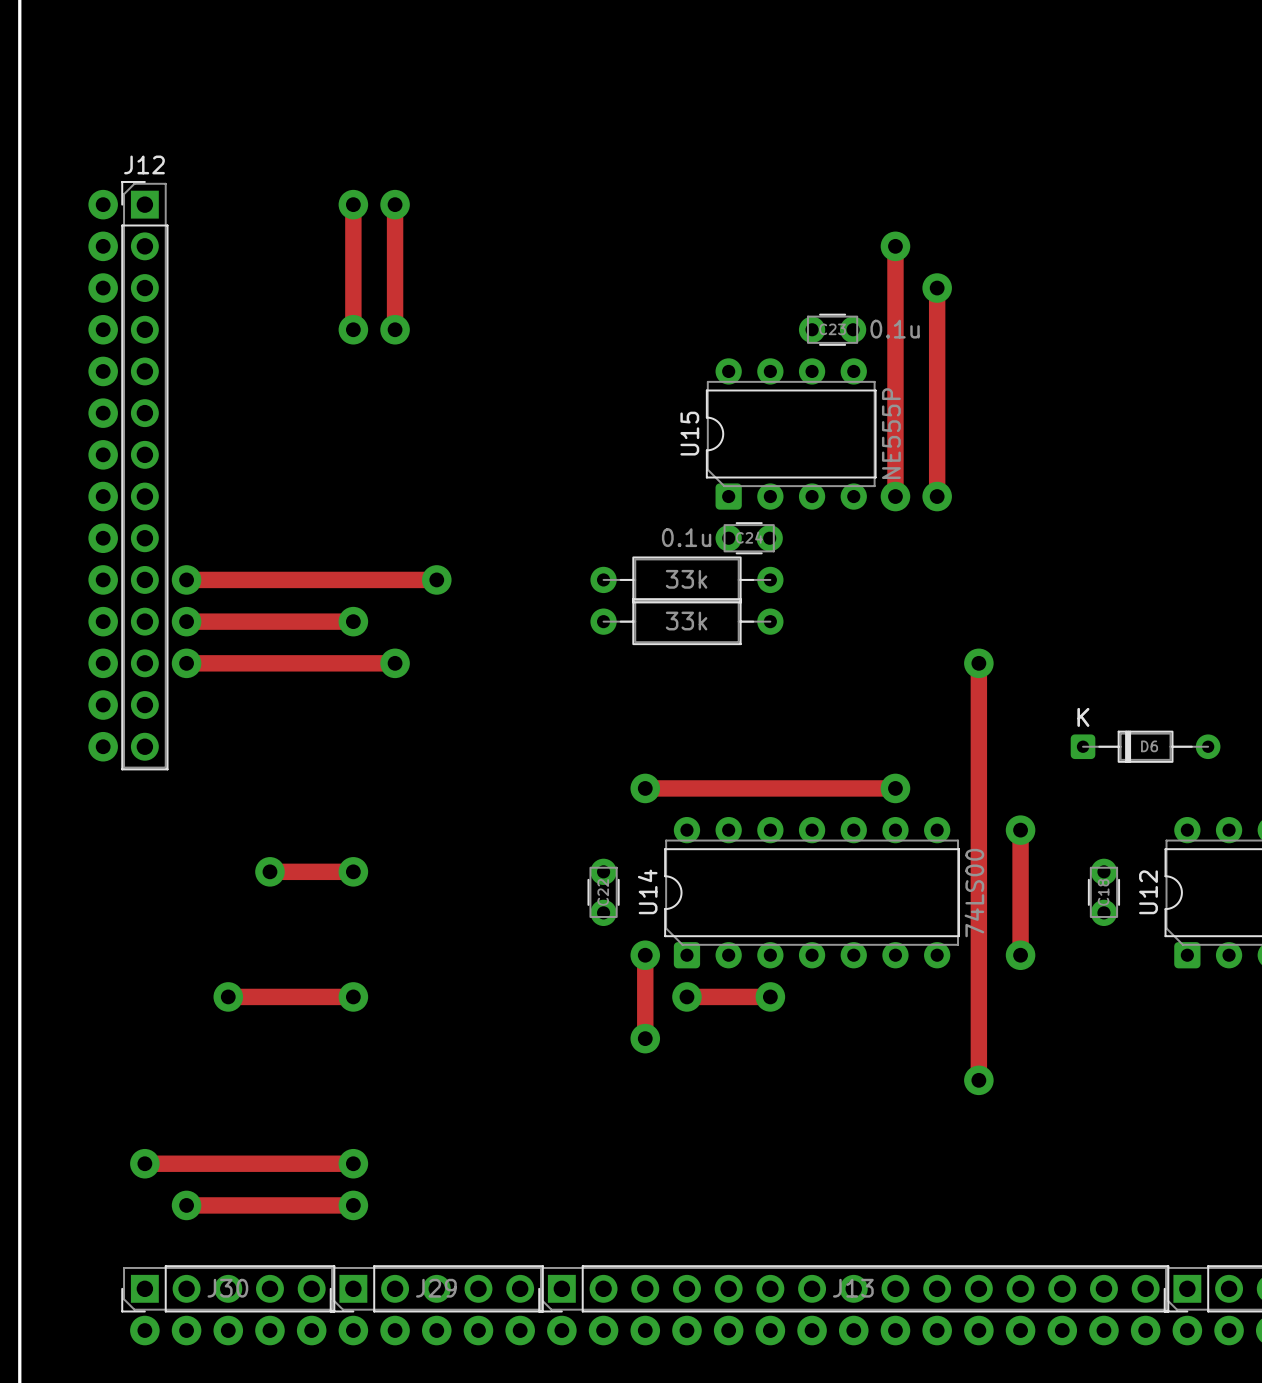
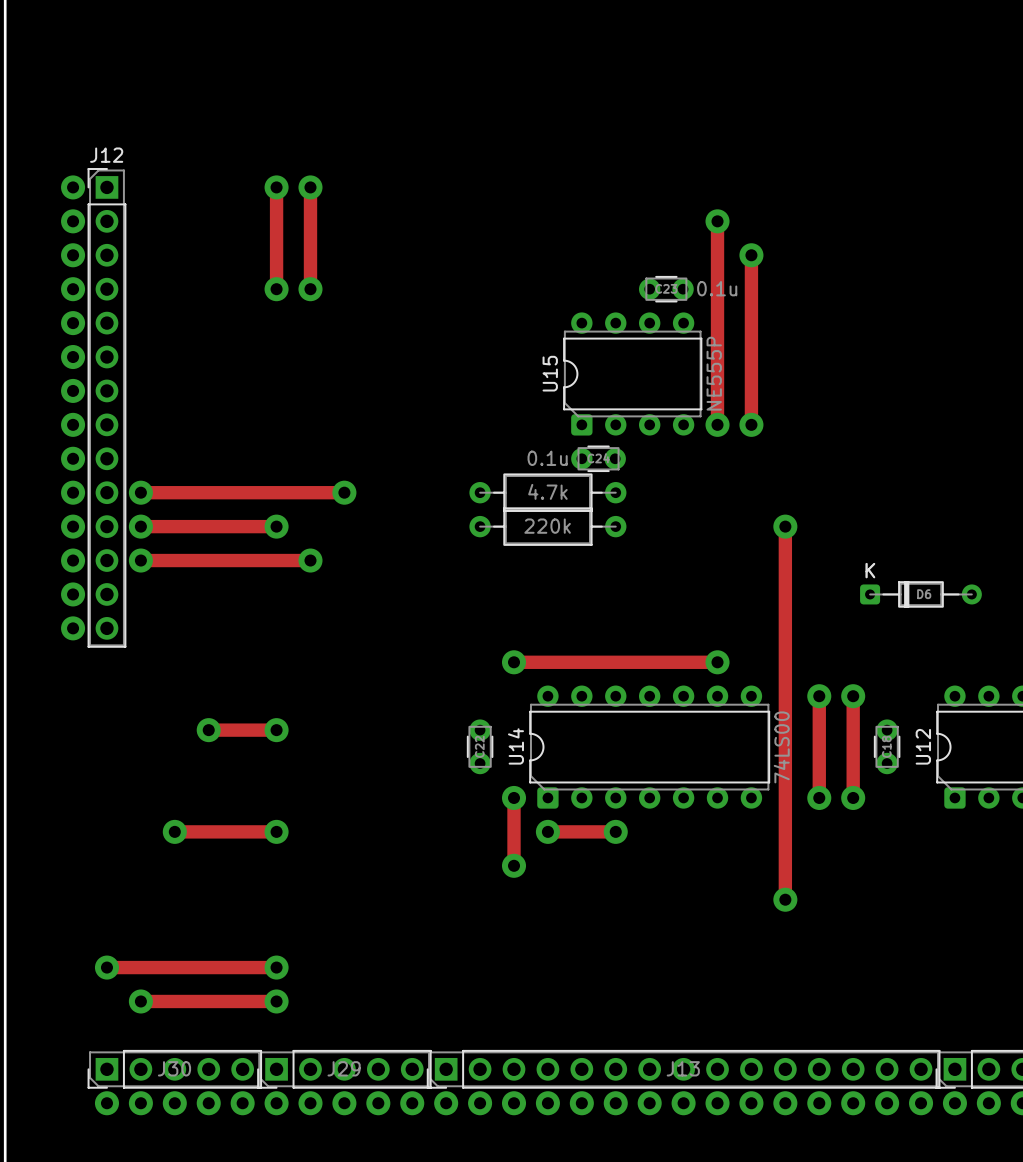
part value: 33k (686, 579) -> 4.7k (547, 491)
part value: 33k (686, 621) -> 220k (547, 526)
track: none -> (785, 526) (785, 560)
via position: (978, 663) -> (785, 526)
D6 position: (1145, 746) -> (920, 594)
track: none -> (853, 696) (853, 797)
via: none -> (853, 696)
via: none -> (853, 797)

